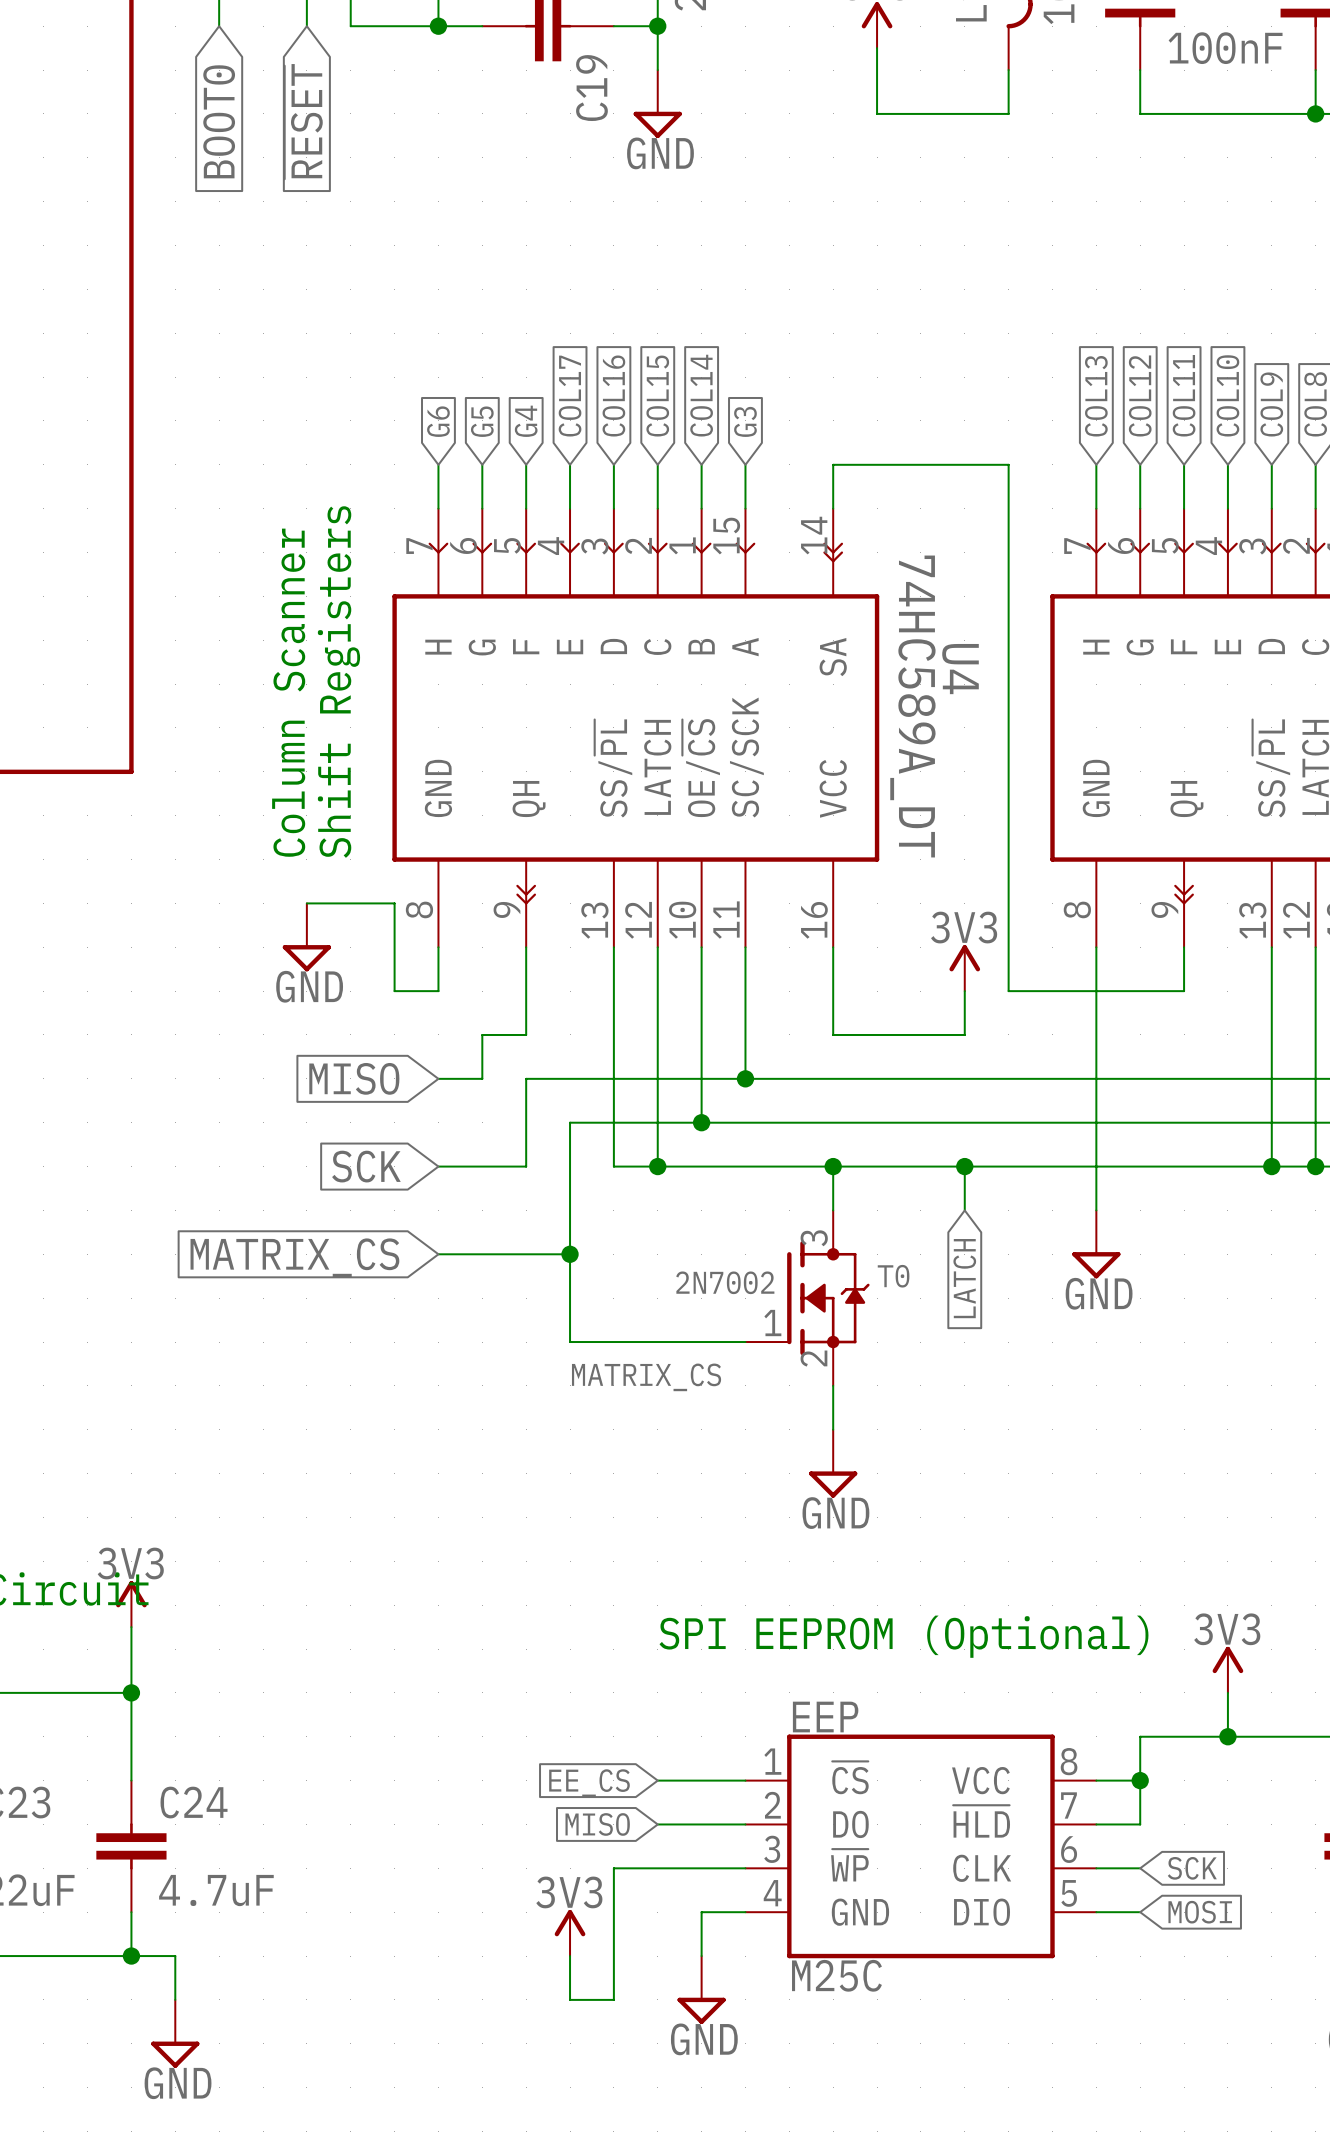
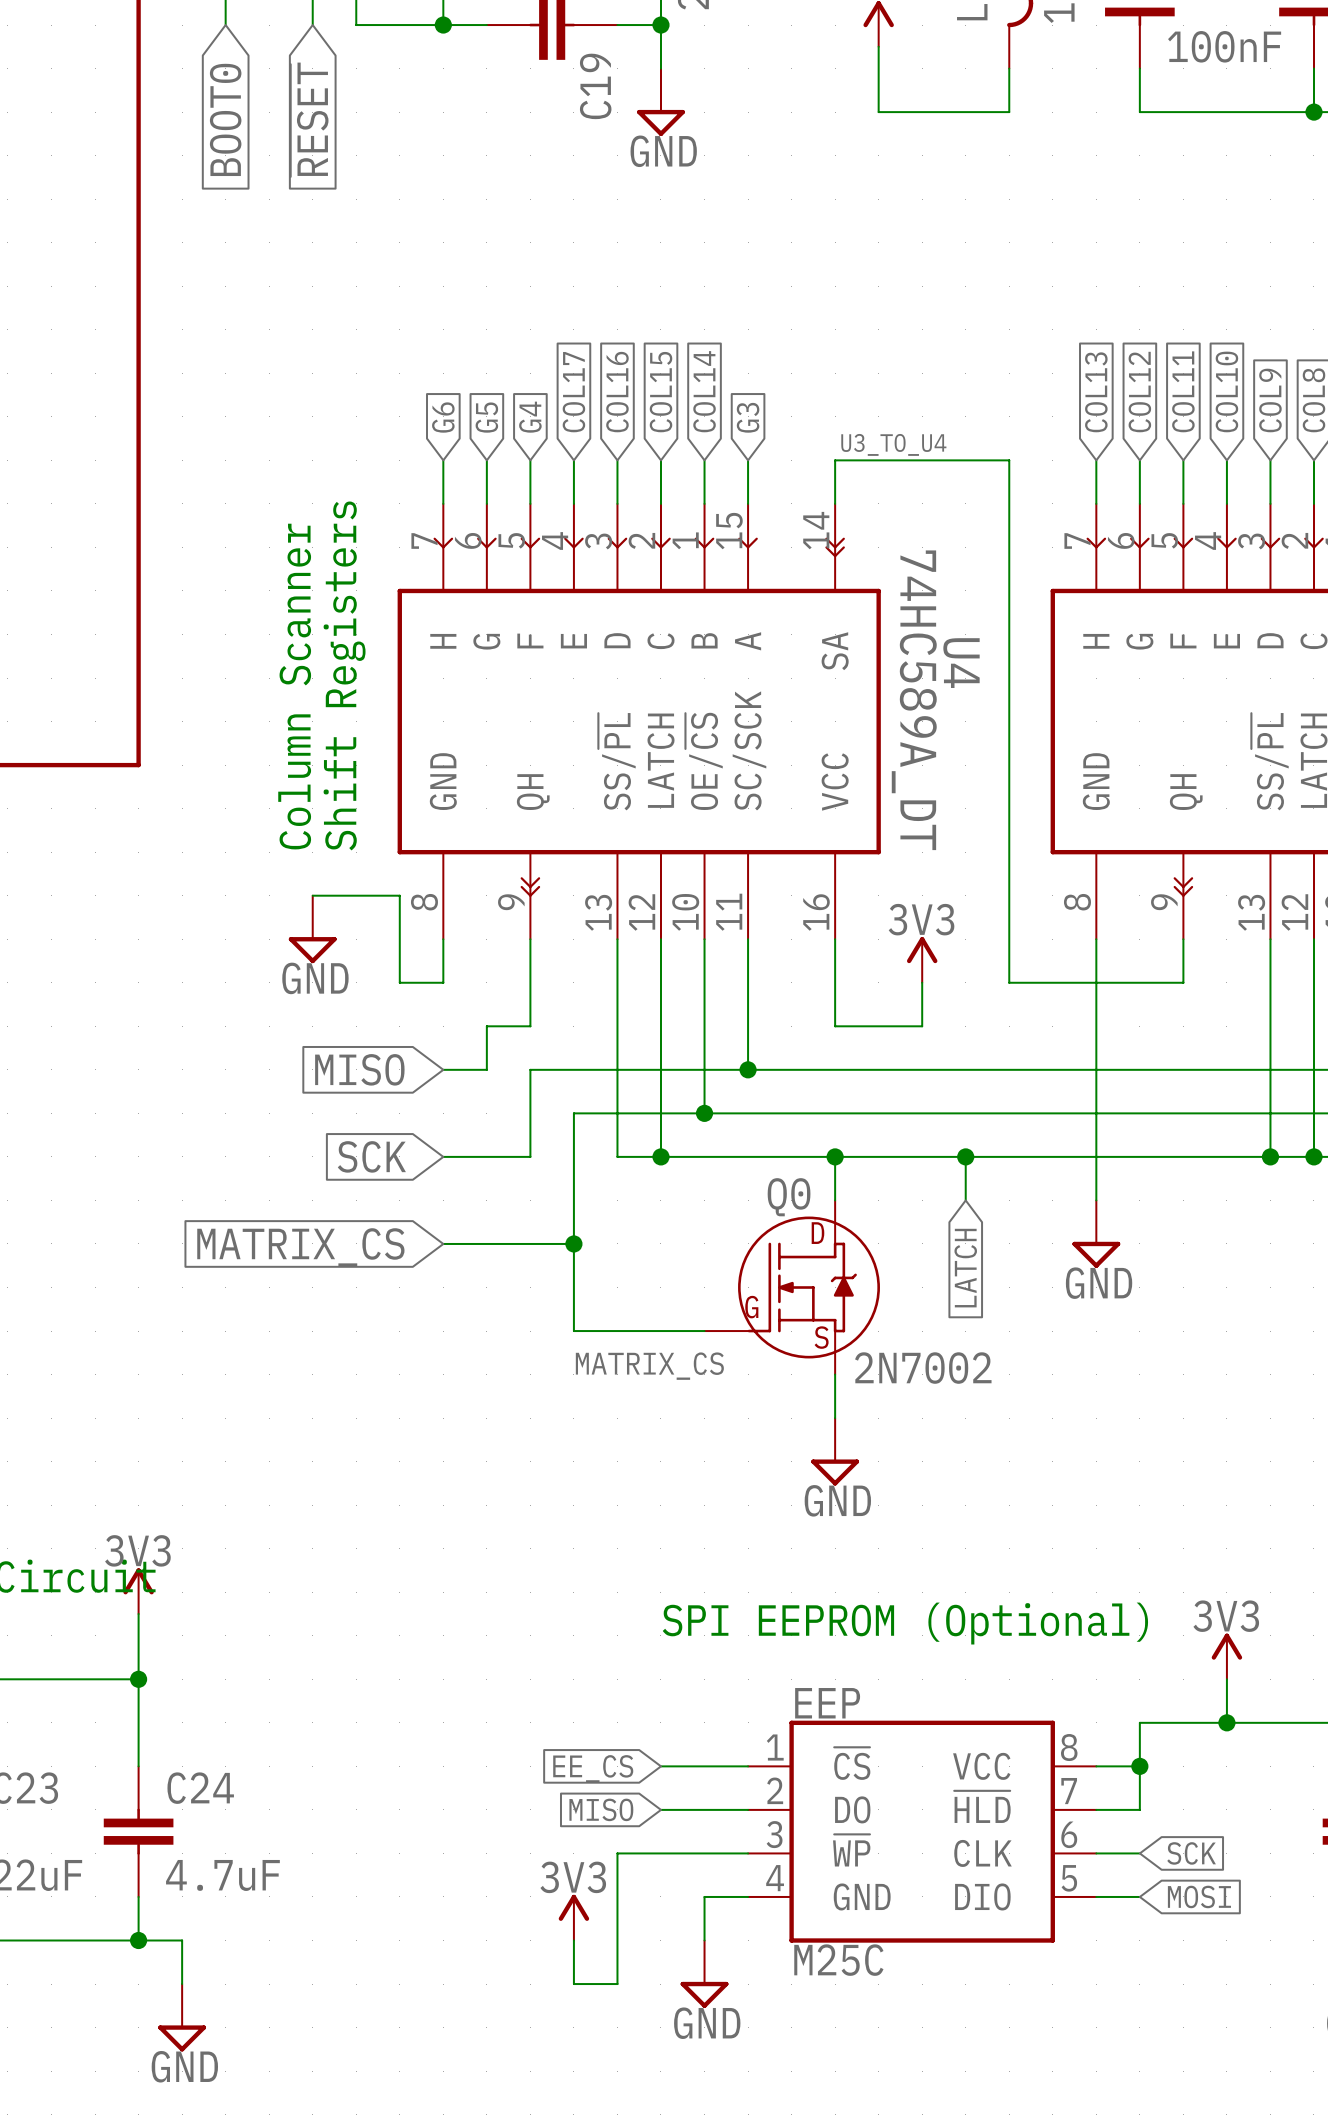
label: none -> U3_TO_U4 (893, 444)
power symbol position: 3V3 (964, 968) -> 3V3 (922, 959)
wire: (964, 991) (964, 1034) (920, 1034) -> (922, 982) (922, 1026)
Q0: none -> 2N7002 (792, 1287)
T0: 2N7002 (807, 1298) -> none

